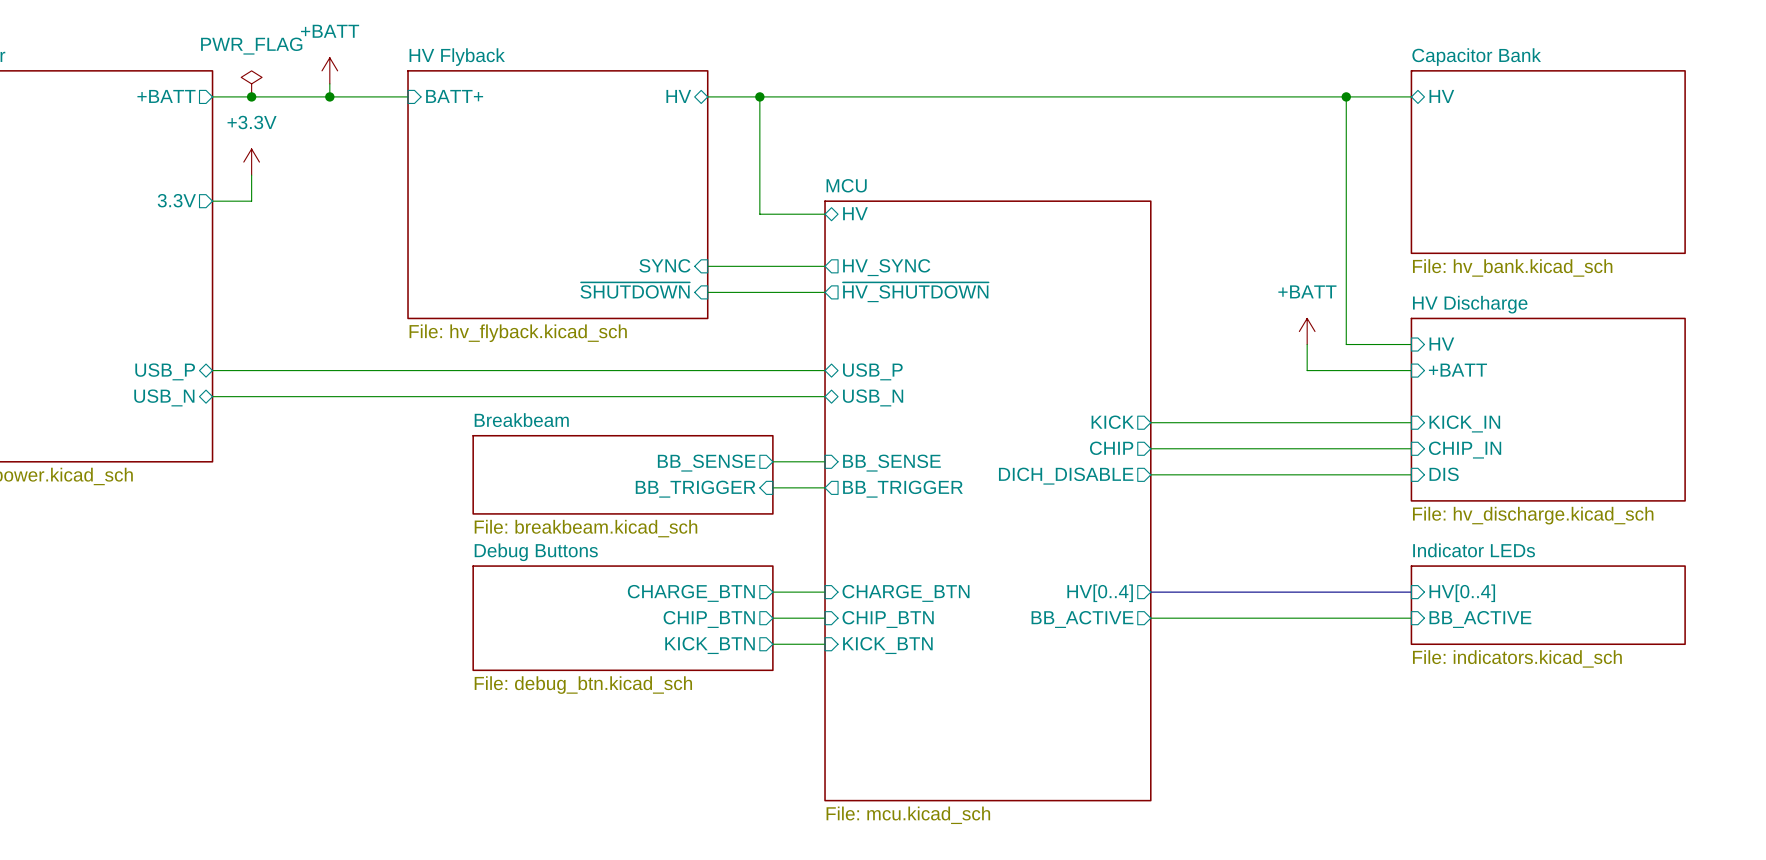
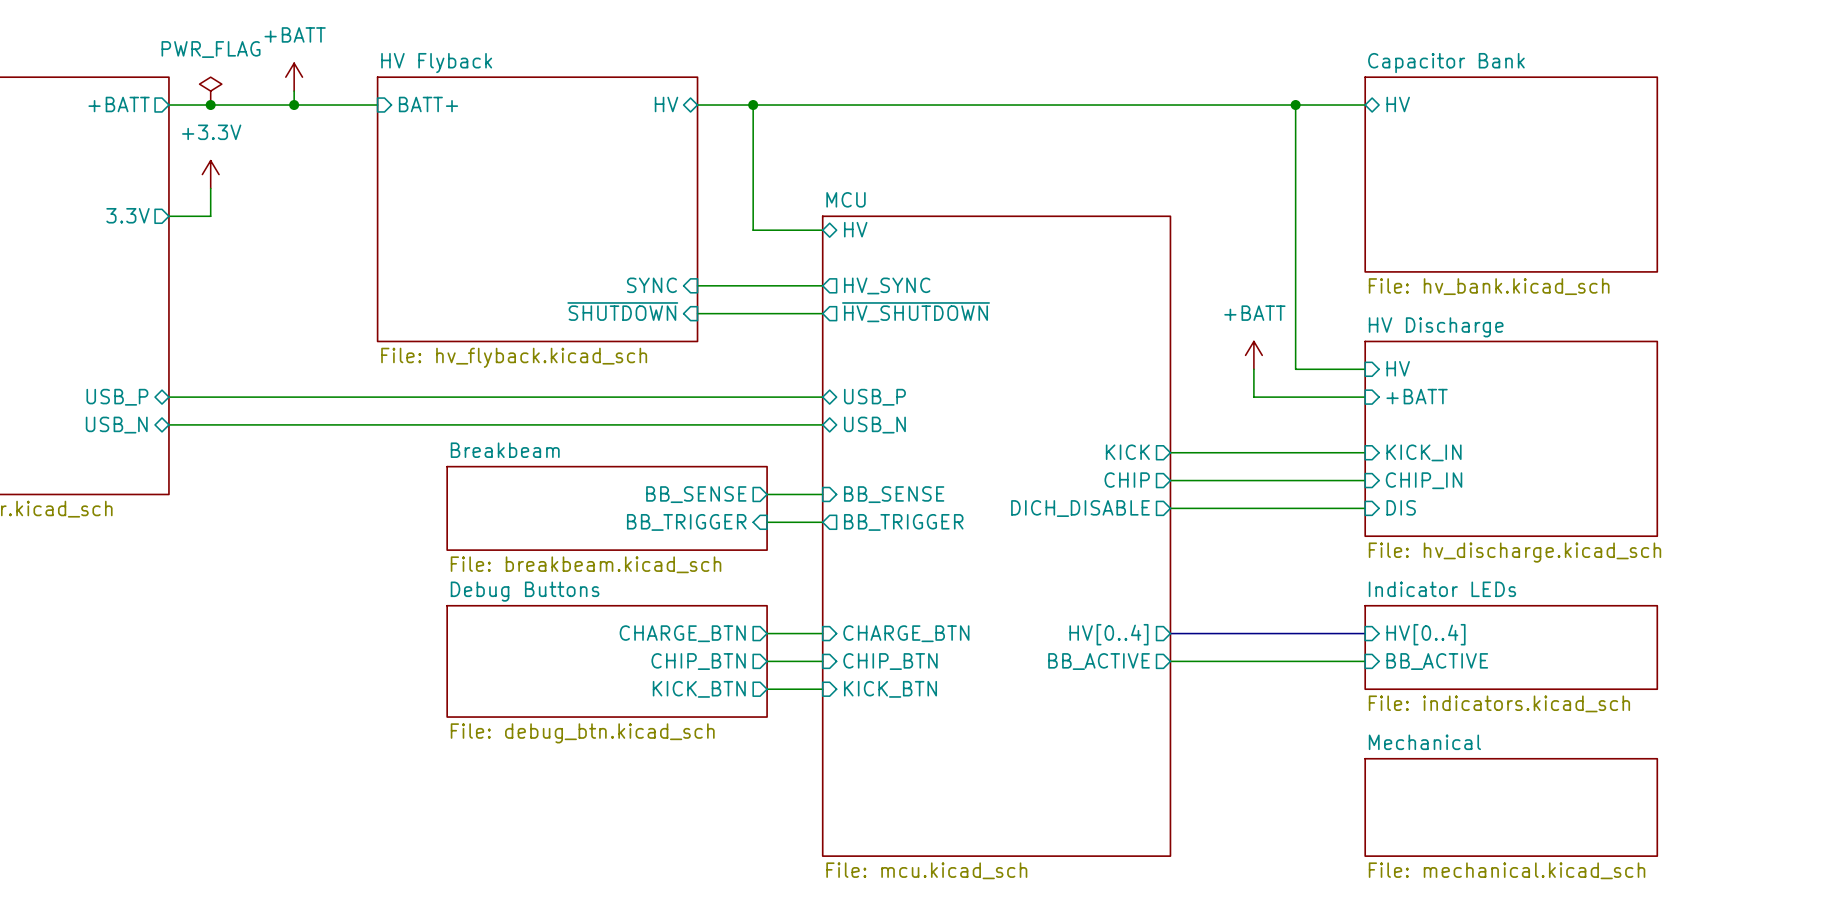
junction: none -> (1295, 105)
wire: (1333, 96) (1411, 96) -> none
wire: (1346, 96) (1346, 344) (1411, 344) -> (1295, 105) (1295, 369) (1365, 369)
junction: (1346, 96) -> none
sheet pin position: HV (1441, 96) -> HV (1398, 104)
sheet Capacitor Bank position: (1548, 162) -> (1511, 174)
power symbol position: +BATT (1307, 331) -> +BATT (1253, 355)
wire: (1307, 344) (1307, 370) -> (1253, 369) (1253, 397) (1337, 397)
sheet pin position: HV (1441, 344) -> HV (1398, 368)
wire: (1333, 370) (1411, 370) -> none
sheet pin position: +BATT (1457, 370) -> +BATT (1417, 396)
sheet HV Discharge position: (1548, 409) -> (1511, 438)
wire: (1333, 422) (1411, 422) -> none
sheet pin position: KICK_IN (1464, 424) -> KICK_IN (1424, 452)
wire: (1333, 448) (1411, 448) -> none
sheet pin position: CHIP_IN (1465, 450) -> CHIP_IN (1424, 480)
wire: (1333, 474) (1411, 474) -> none
sheet pin position: DIS (1444, 474) -> DIS (1401, 507)
bus: (1333, 592) (1411, 592) -> none
sheet pin position: HV[0..4] (1462, 593) -> HV[0..4] (1426, 634)
sheet Indicator LEDs position: (1548, 605) -> (1511, 647)
wire: (1333, 618) (1411, 618) -> none
sheet pin position: BB_ACTIVE (1480, 619) -> BB_ACTIVE (1437, 661)
sheet Mechanical: none -> File: mechanical.kicad_sch (1511, 807)

